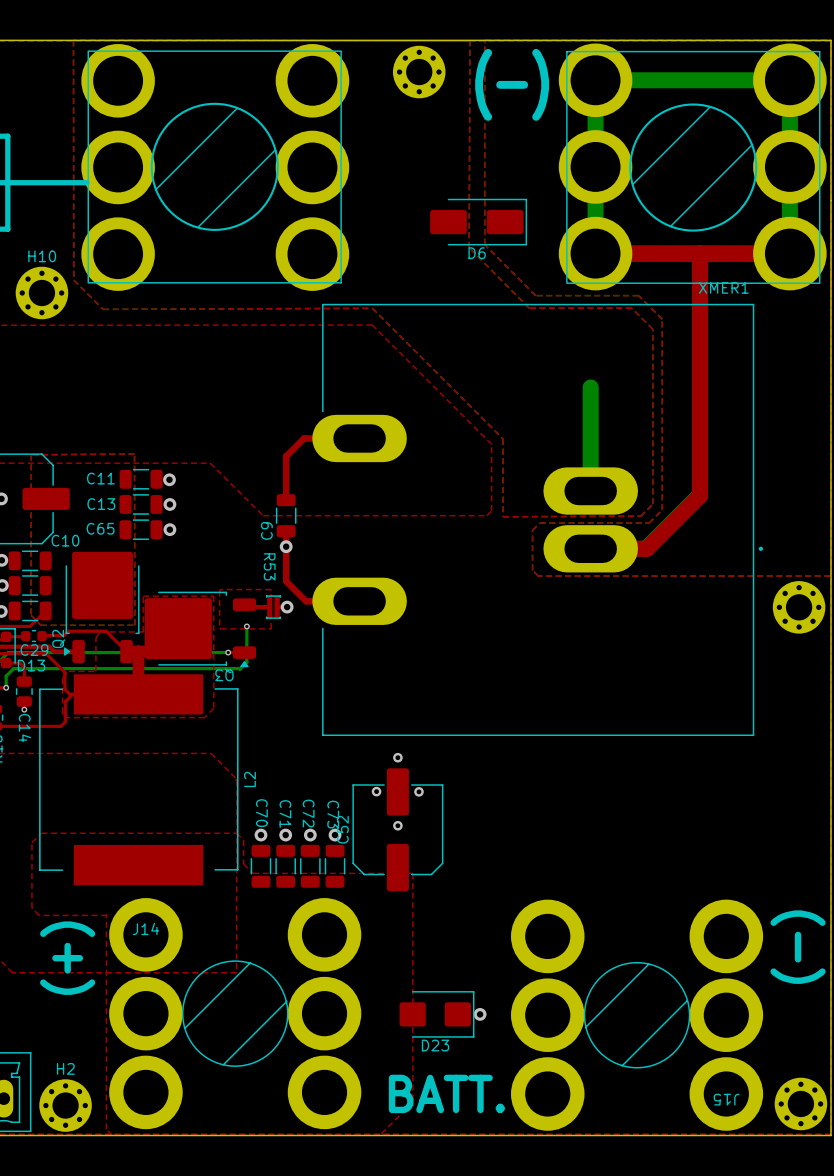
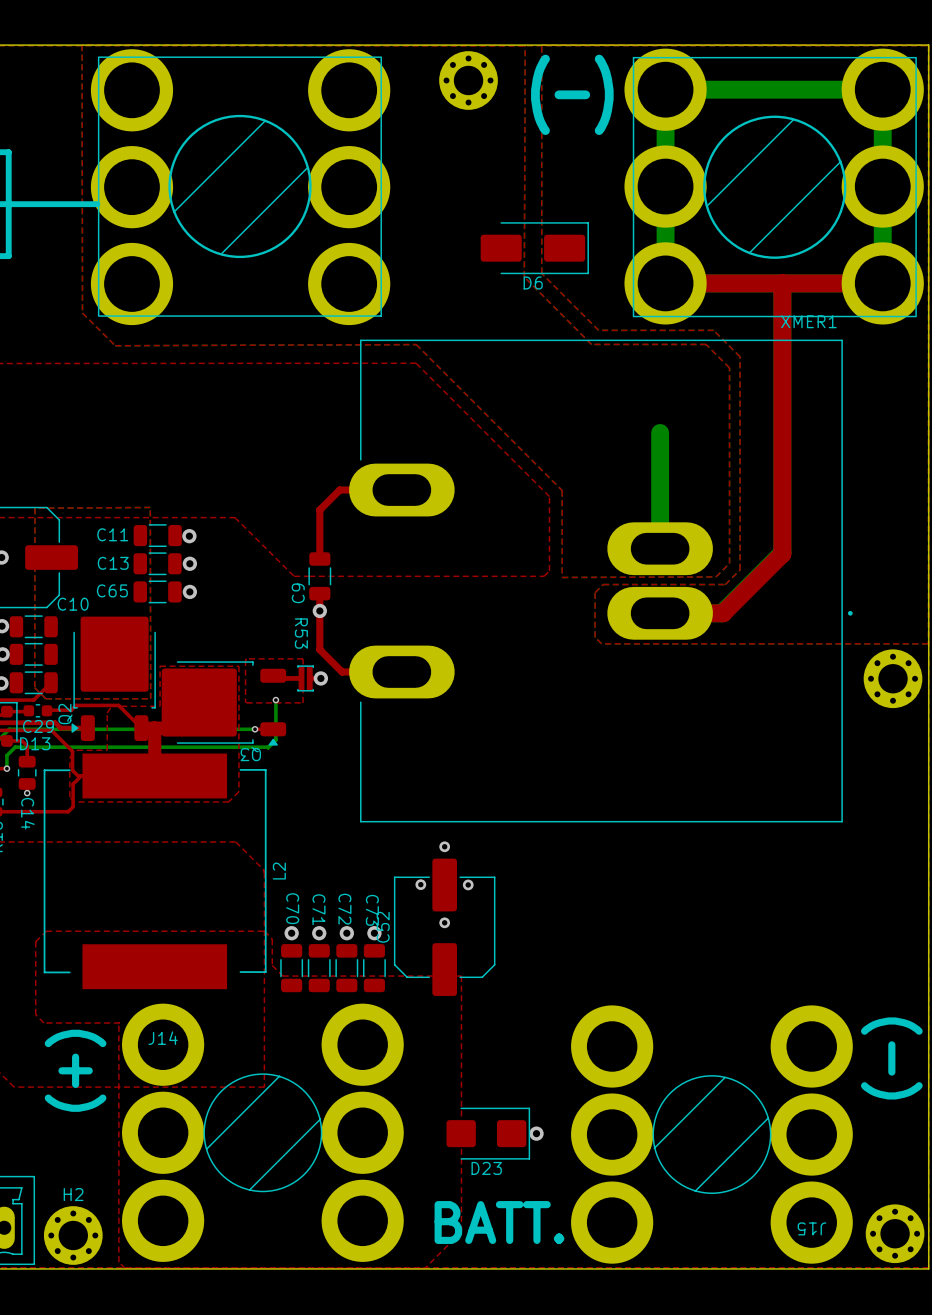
H10: (41, 292) -> none

